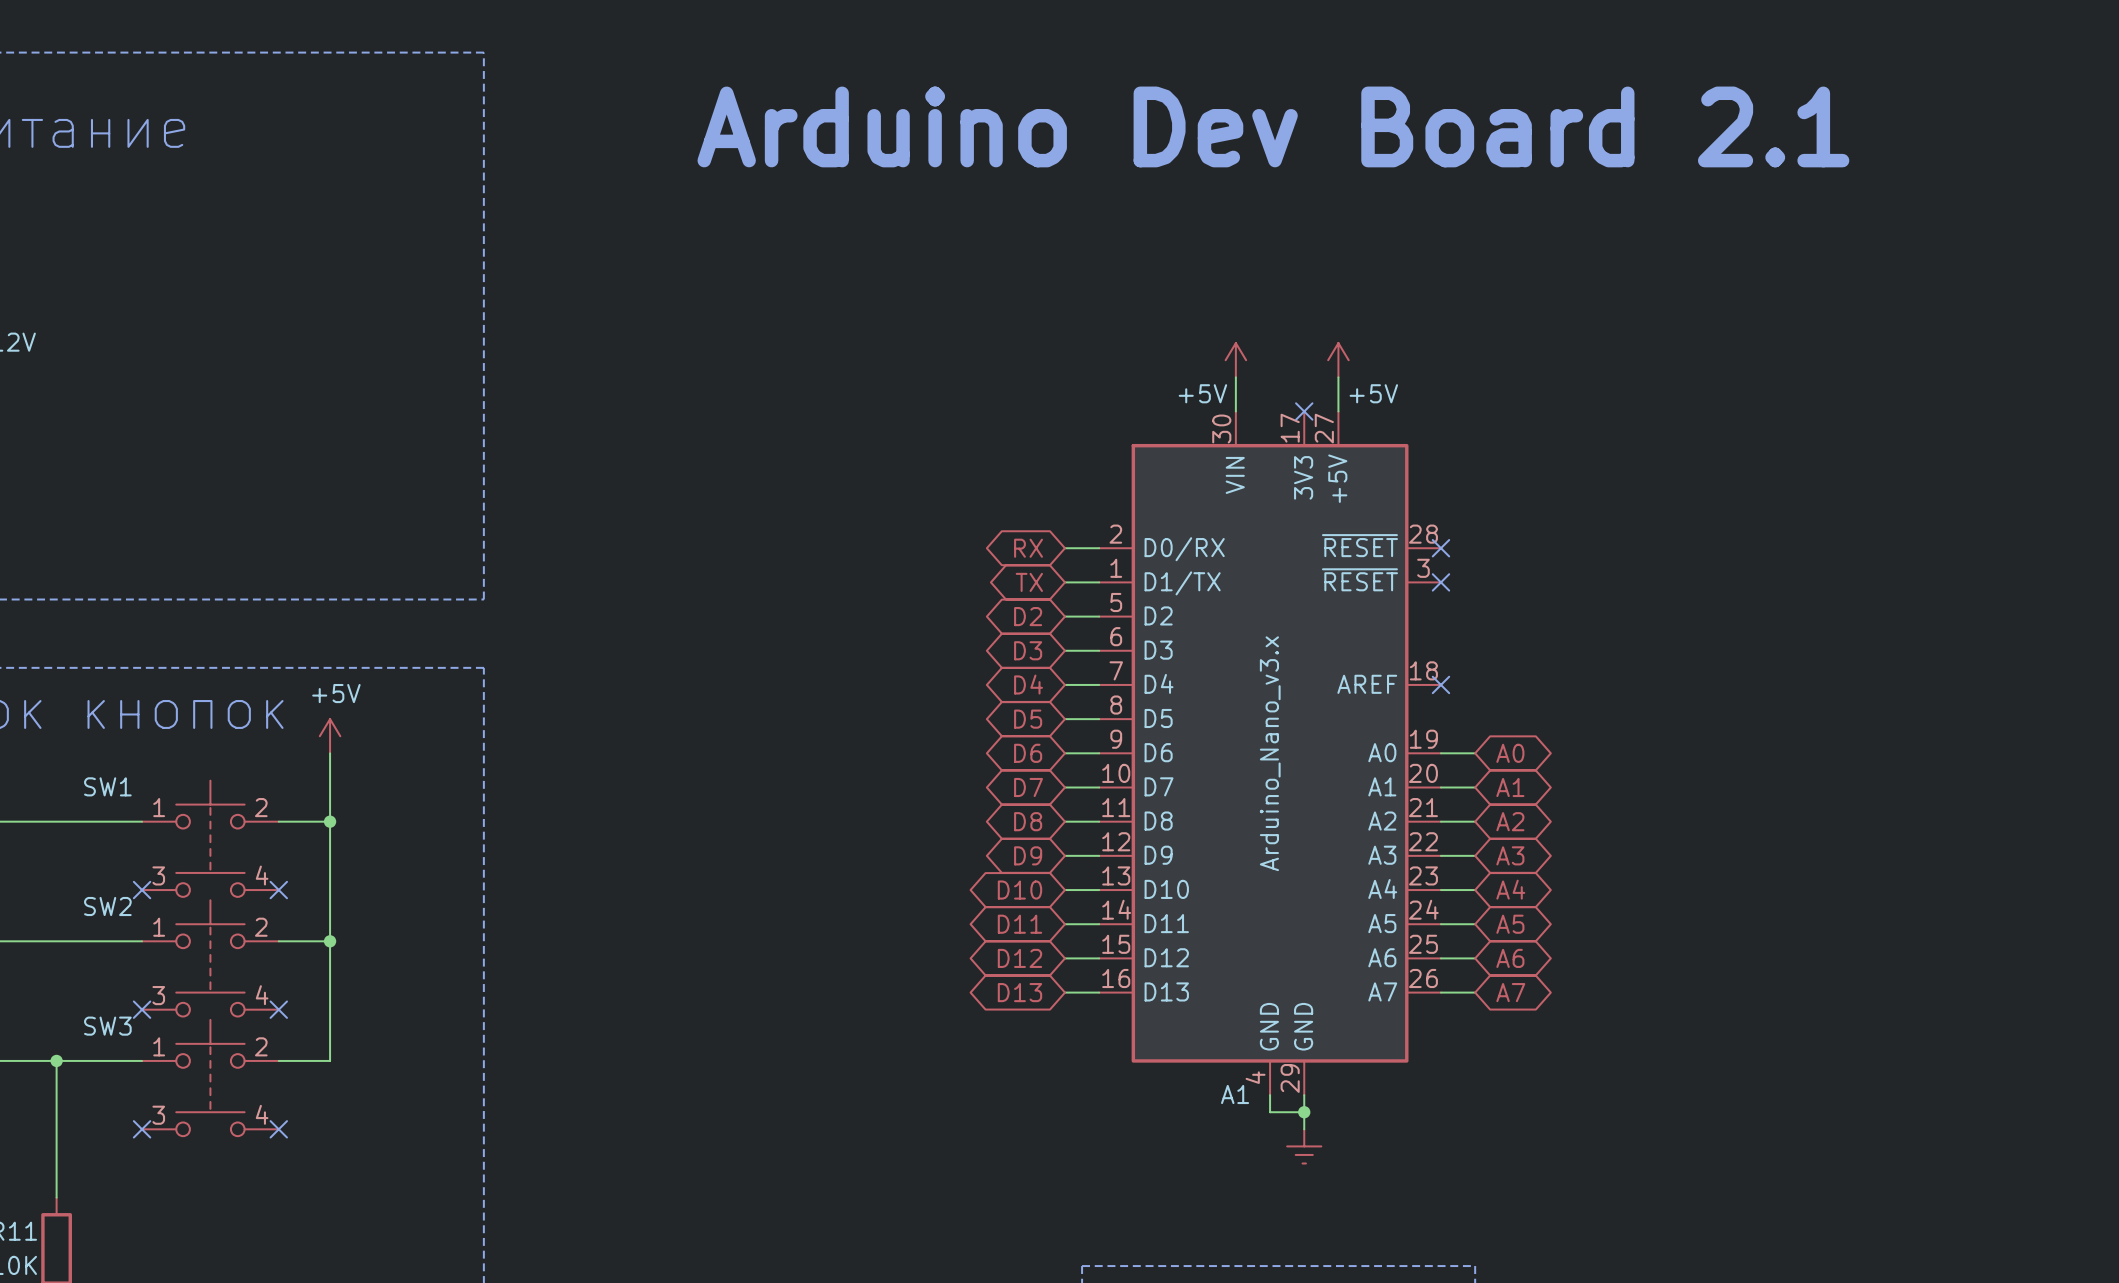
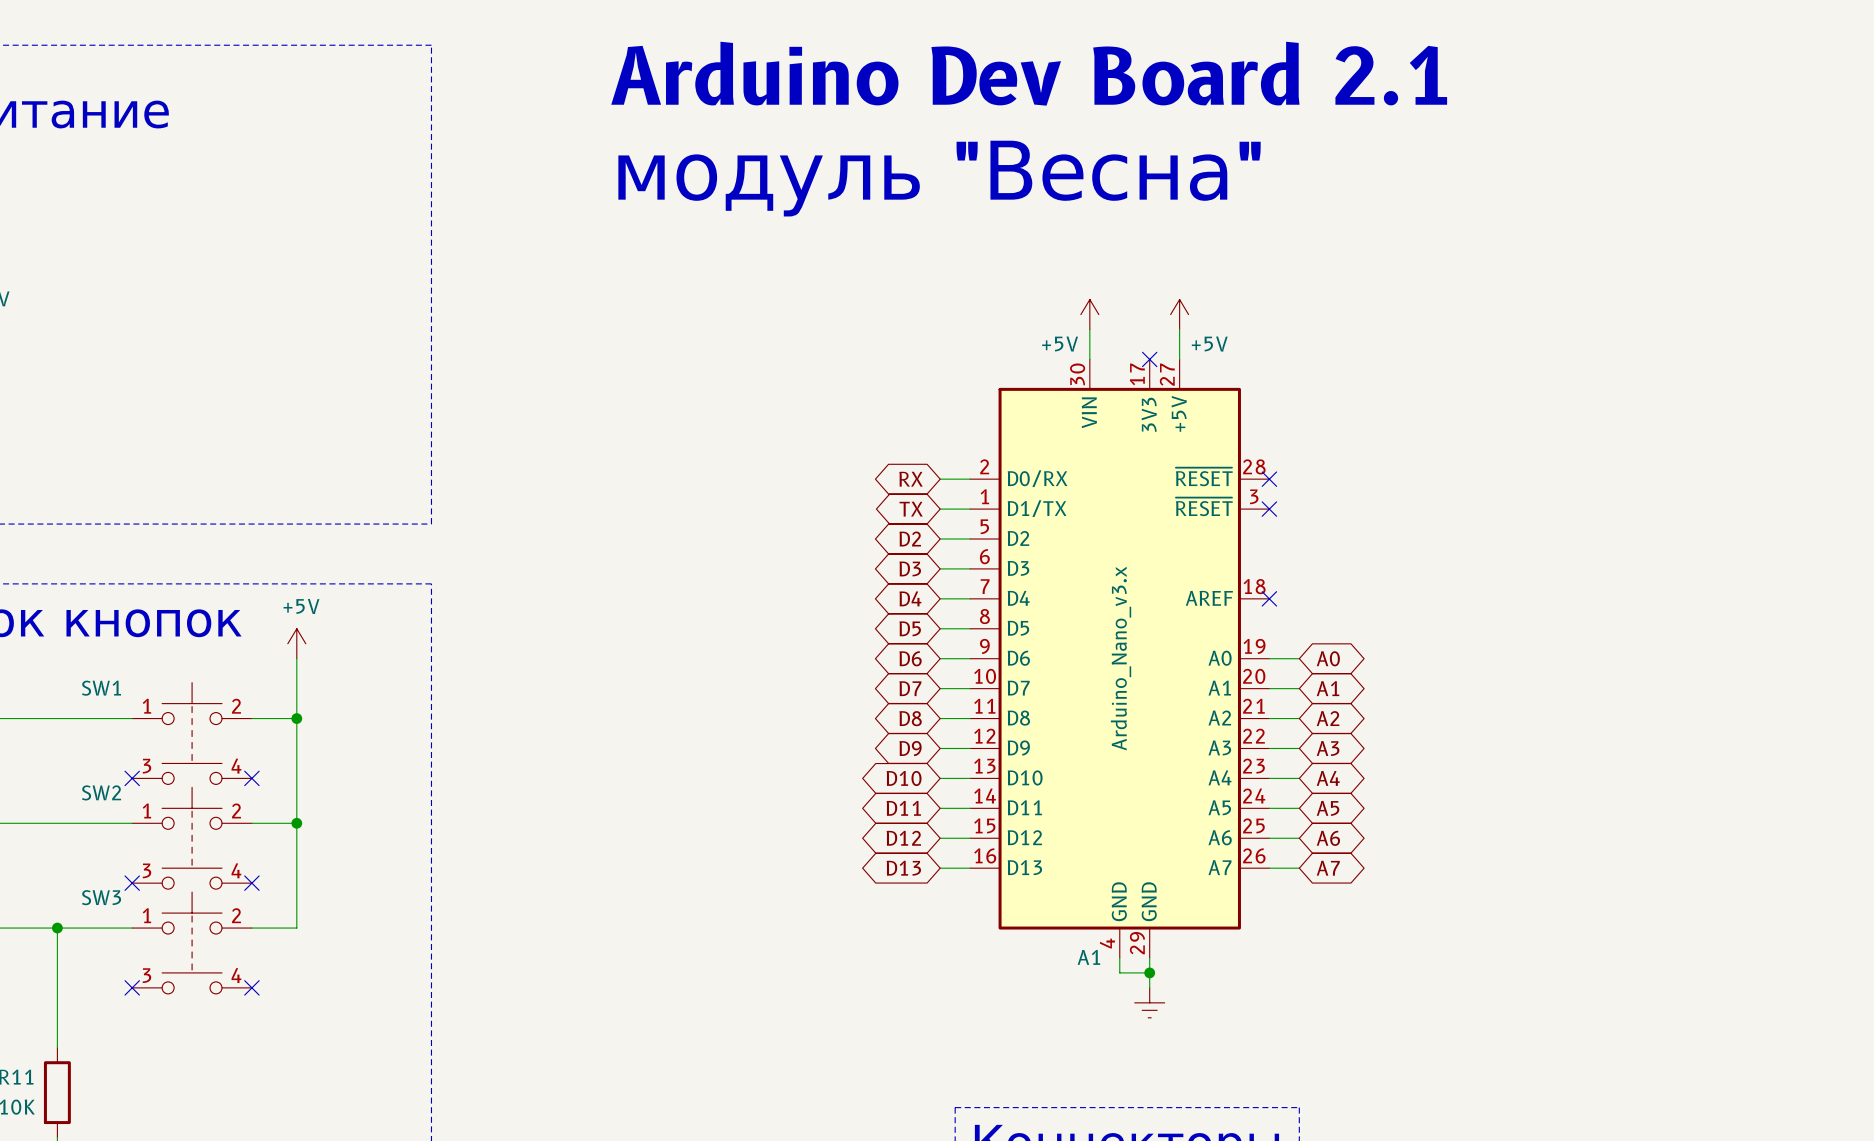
text position: Arduino Dev Board 2.1 (1273, 126) -> Arduino Dev Board 2.1 (1029, 73)
text: none -> модуль "Весна" (939, 178)

